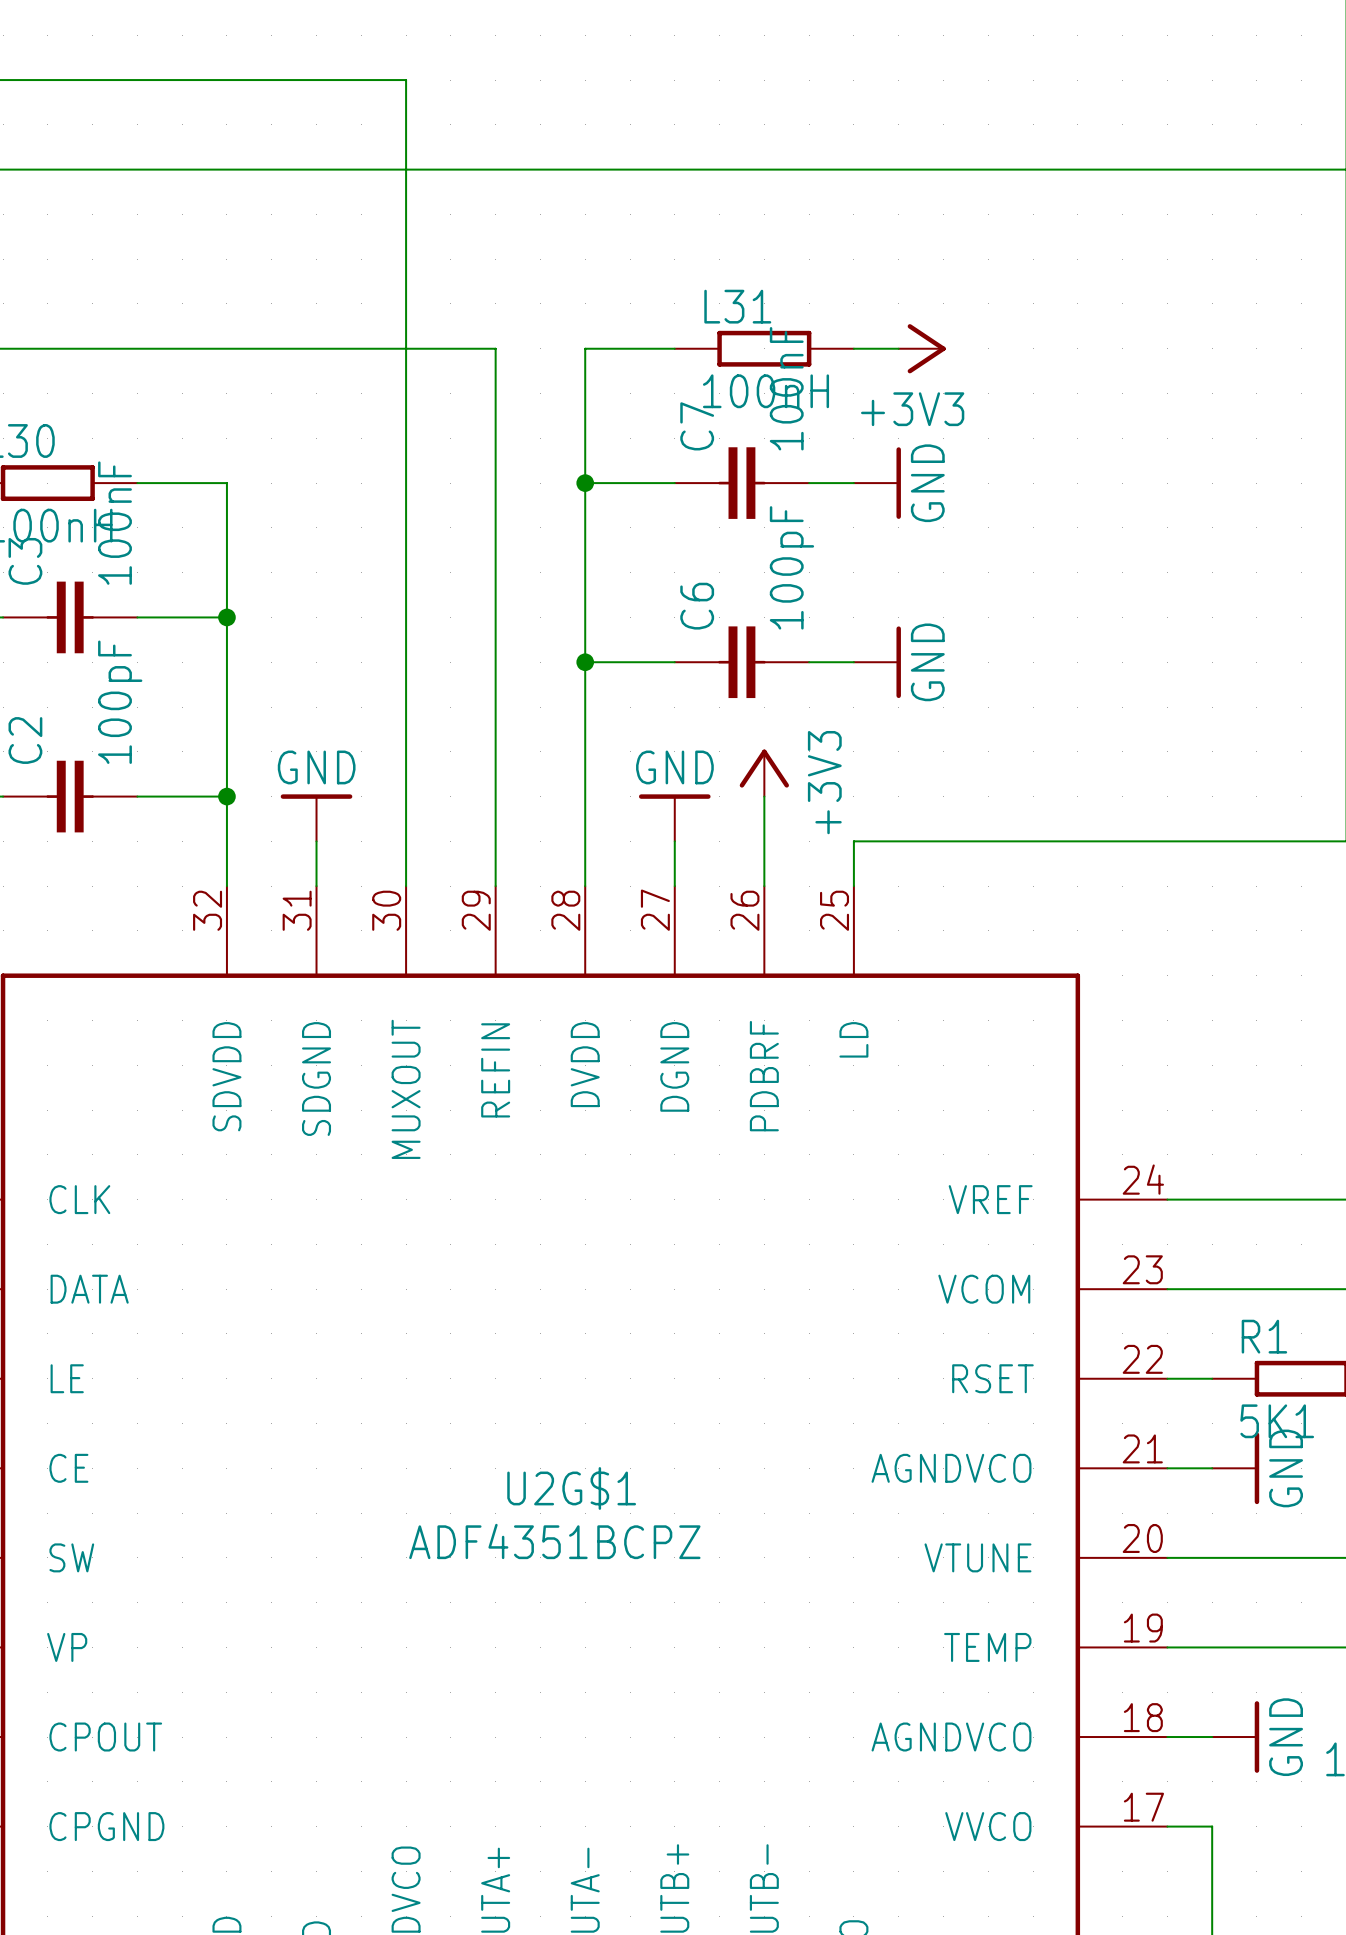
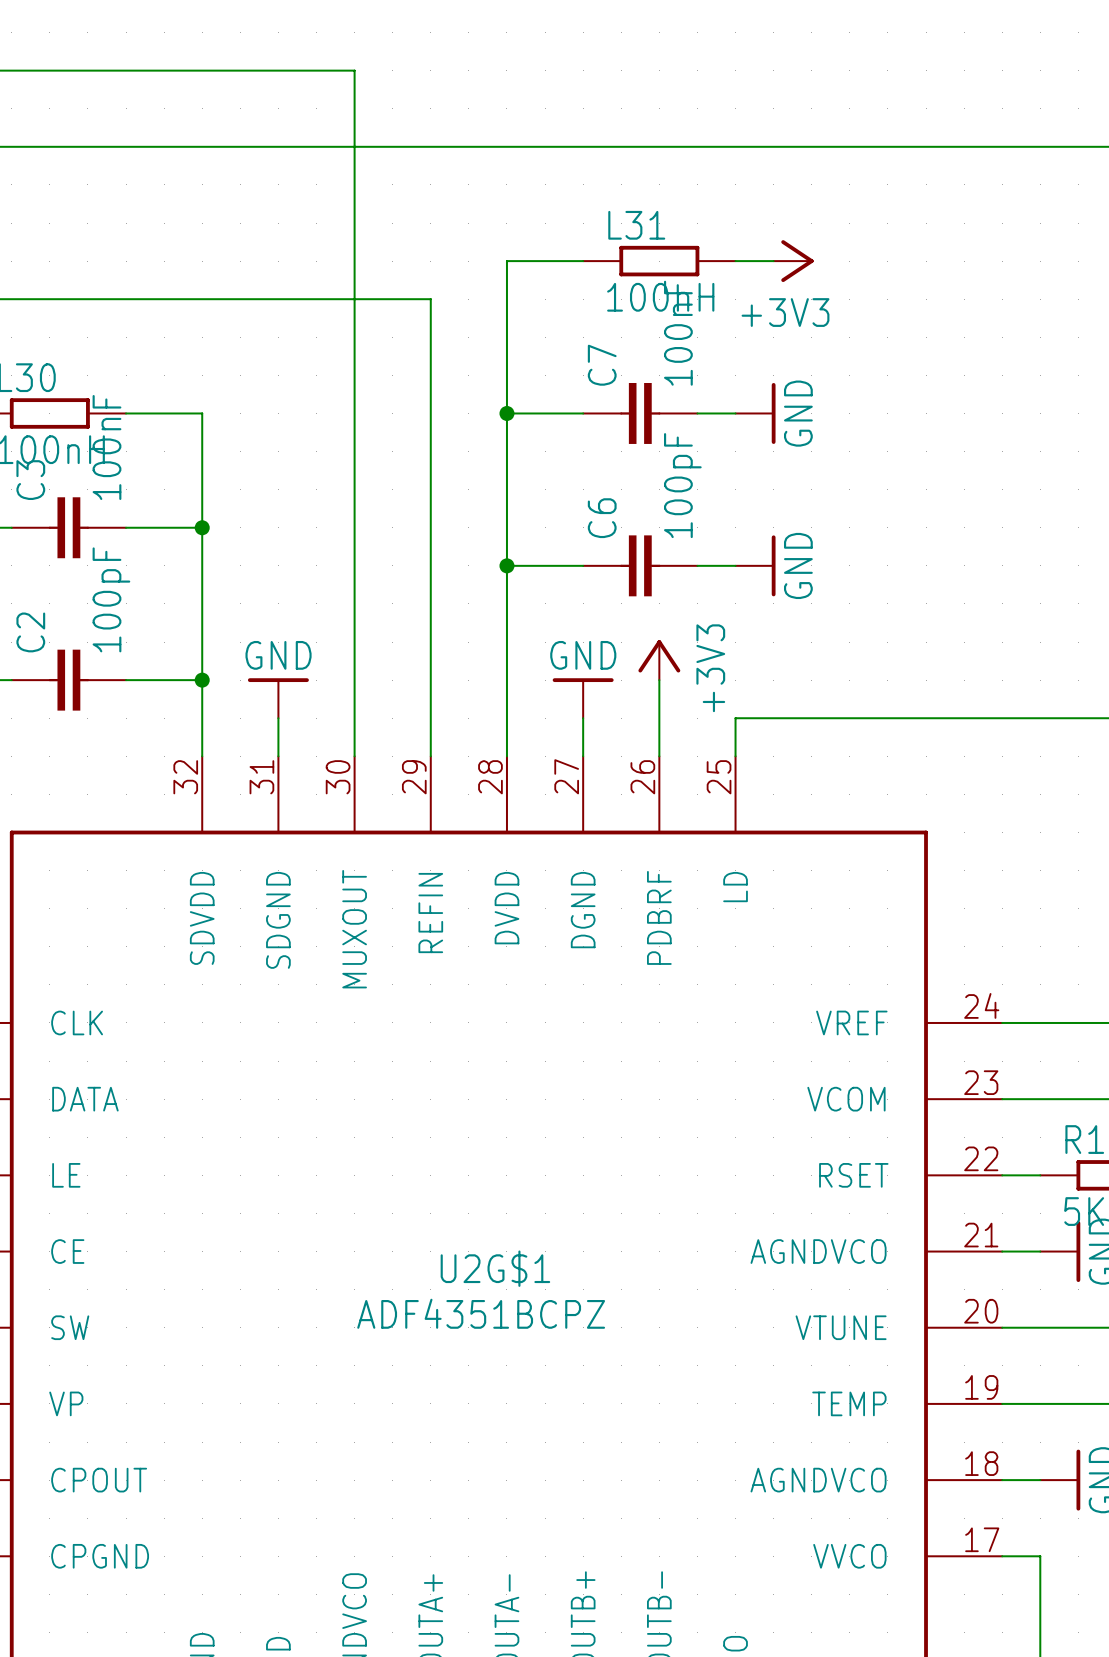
wire: (585, 348) (674, 348) -> (506, 299) (506, 261) (583, 261)
L31 position: (764, 348) -> (659, 261)
wire: (853, 348) (898, 348) -> (735, 261) (773, 261)
power symbol position: +3V3 (922, 348) -> +3V3 (793, 261)

